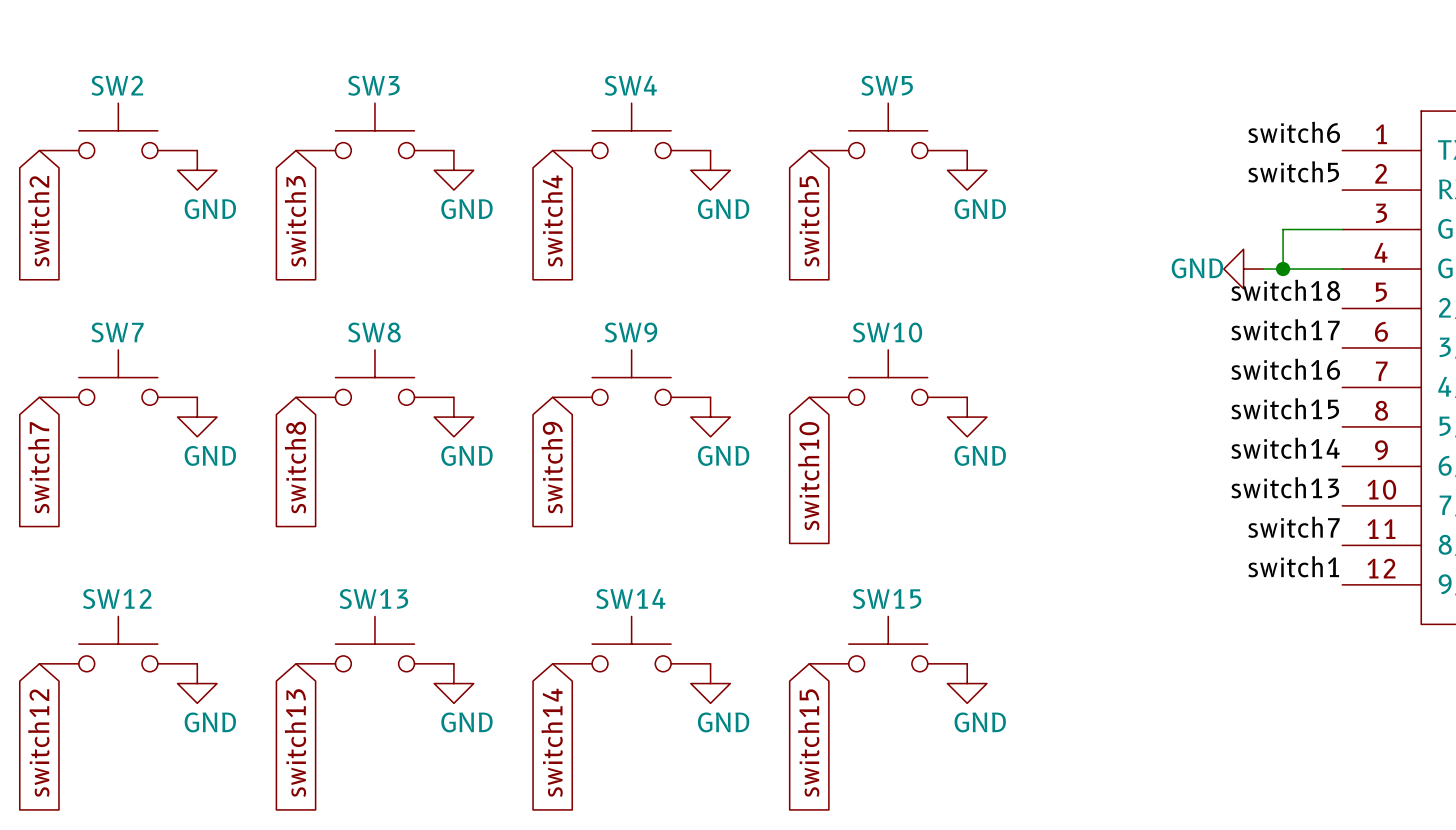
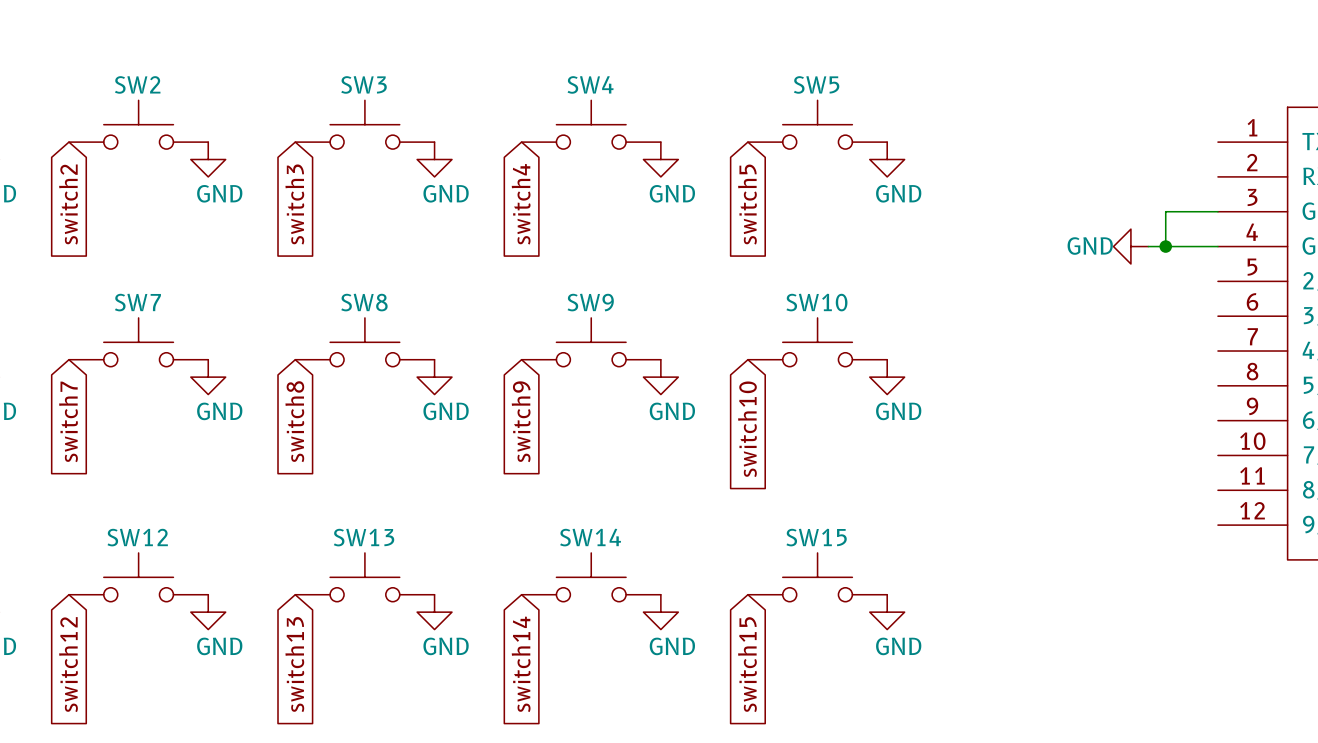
label: switch6 (1294, 132) -> none
label: switch5 (1293, 171) -> none
label: switch18 (1285, 290) -> none
label: switch17 (1285, 329) -> none
label: switch16 (1285, 369) -> none
label: switch15 (1285, 408) -> none
label: switch14 (1285, 448) -> none
label: switch13 (1285, 487) -> none
label: switch7 (1294, 527) -> none
label: switch1 (1293, 566) -> none

